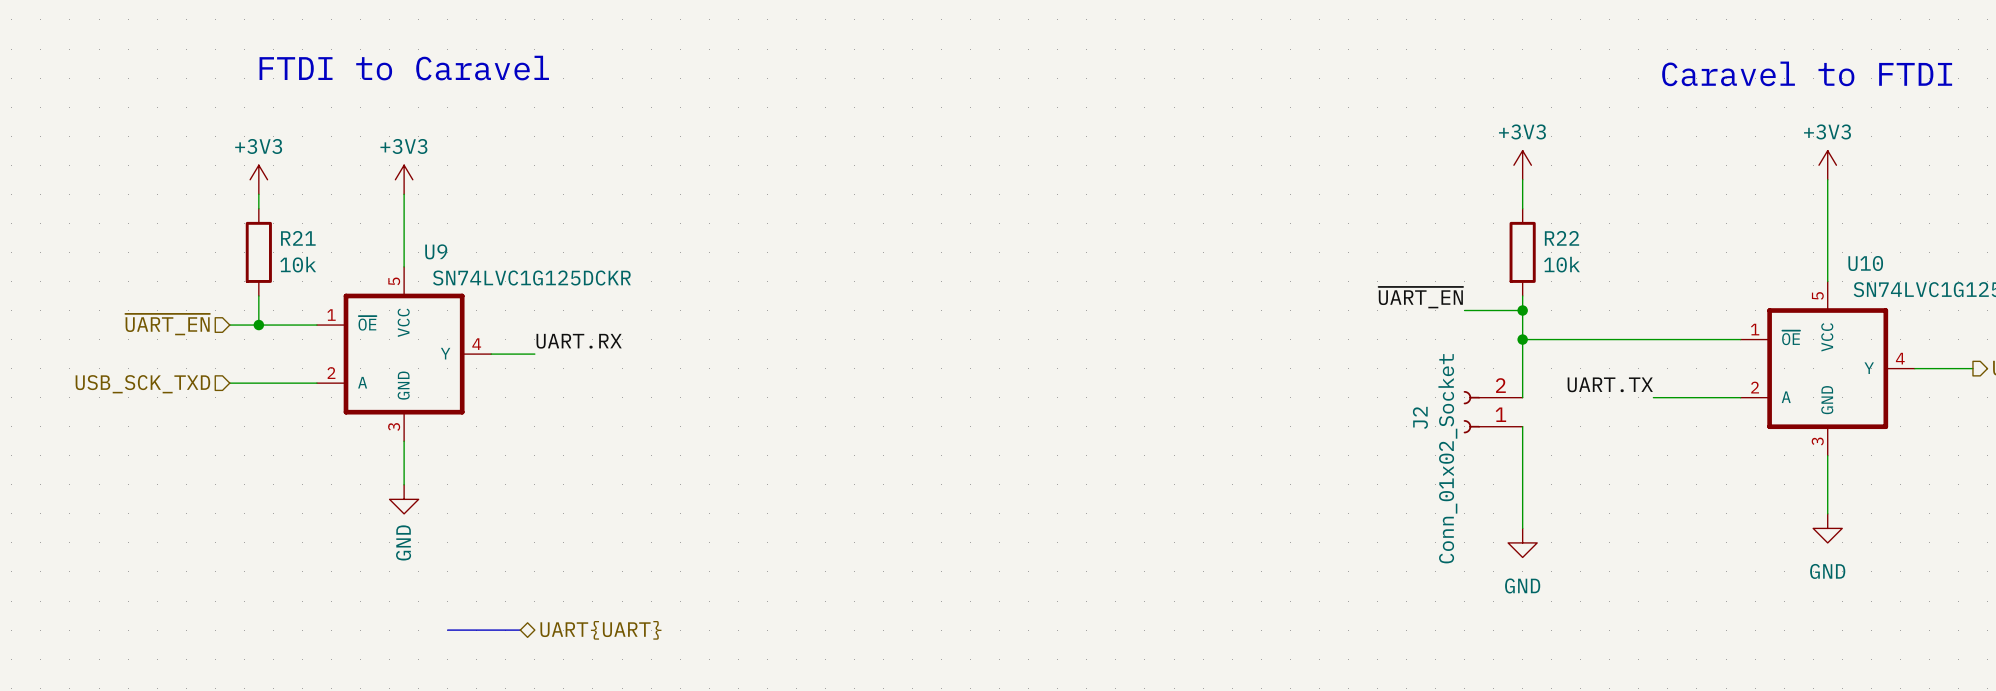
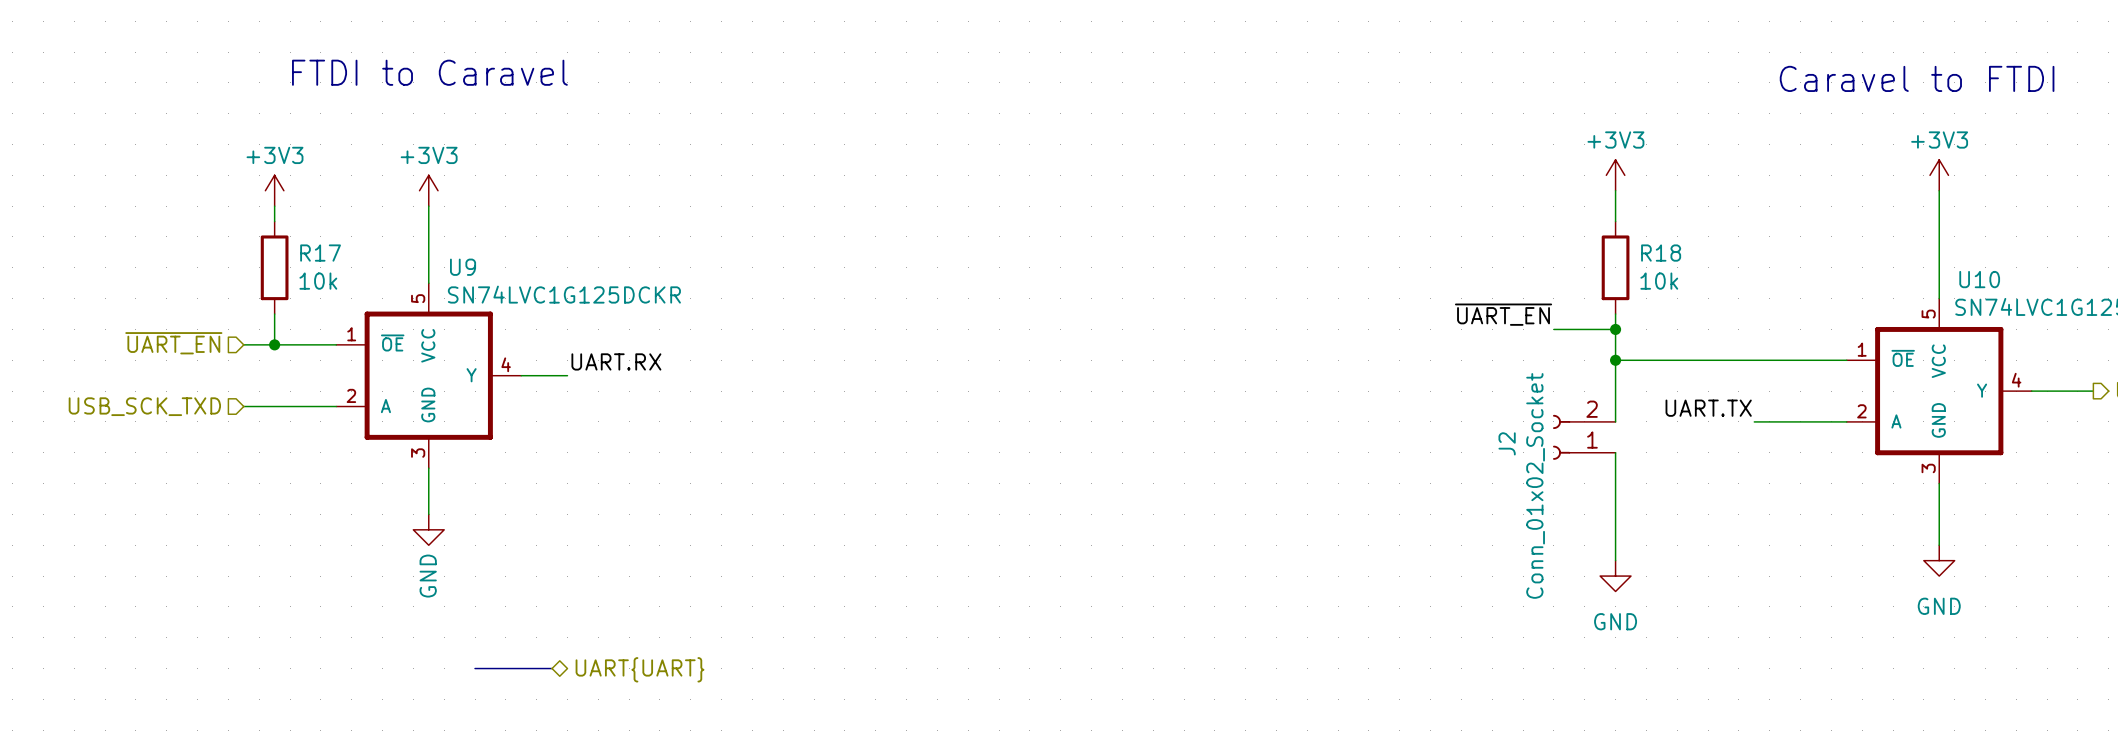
R21 name: R21 (298, 238) -> R17 (320, 253)
R22 name: R22 (1562, 238) -> R18 (1661, 253)

